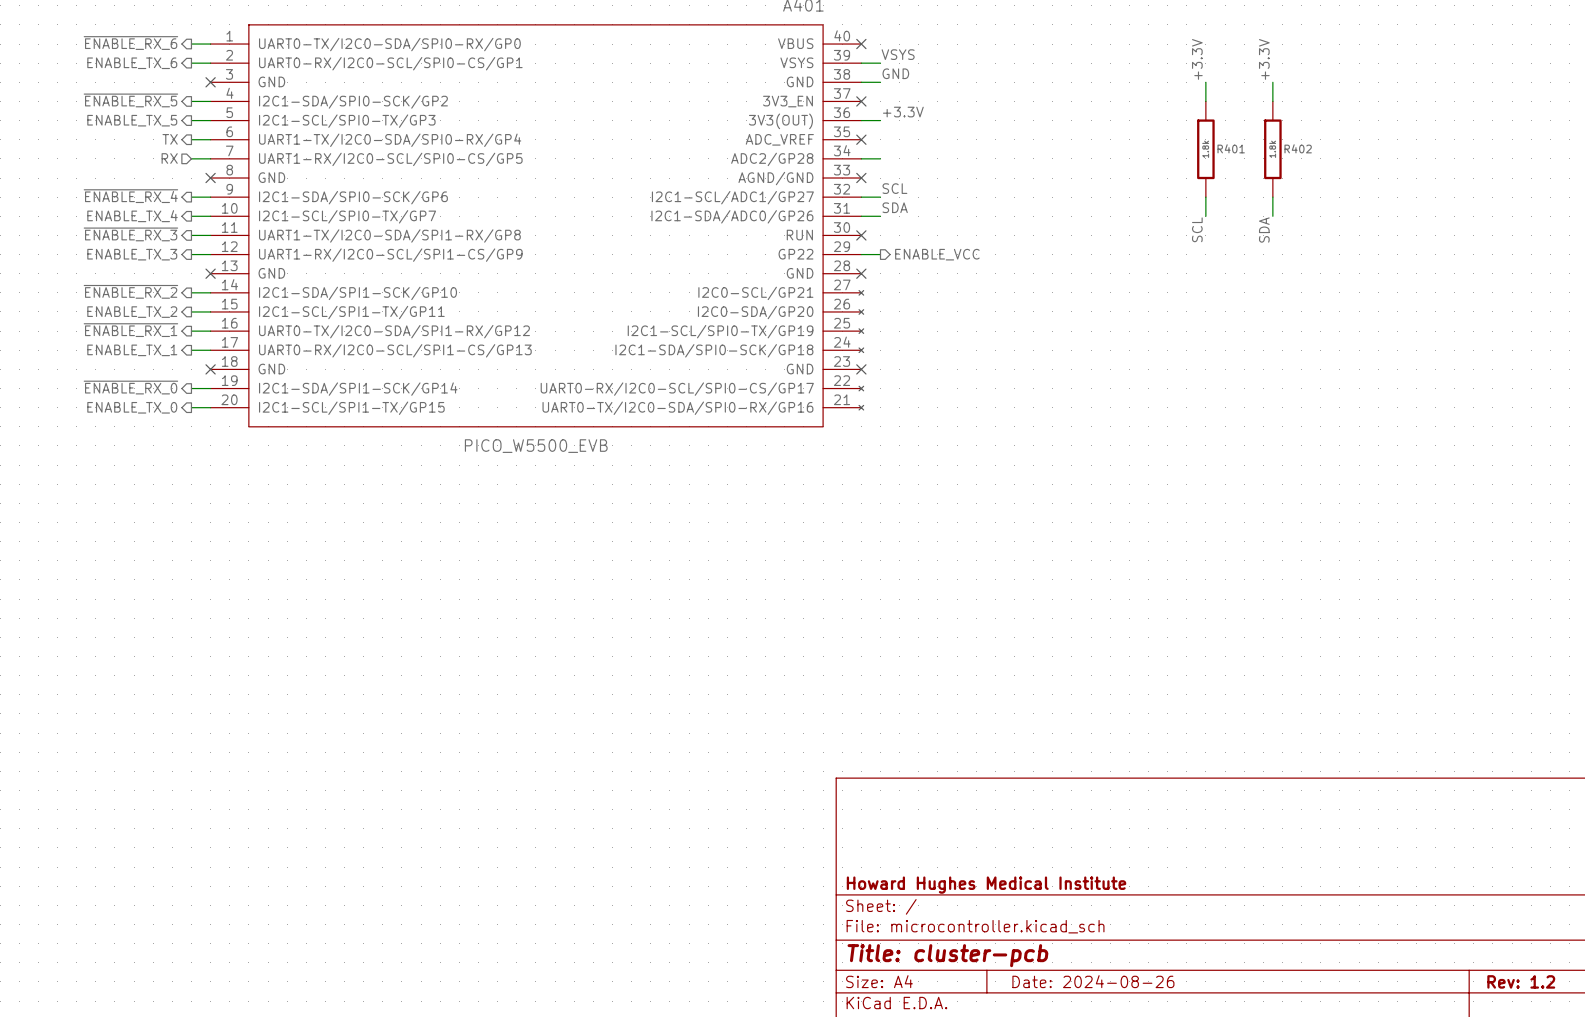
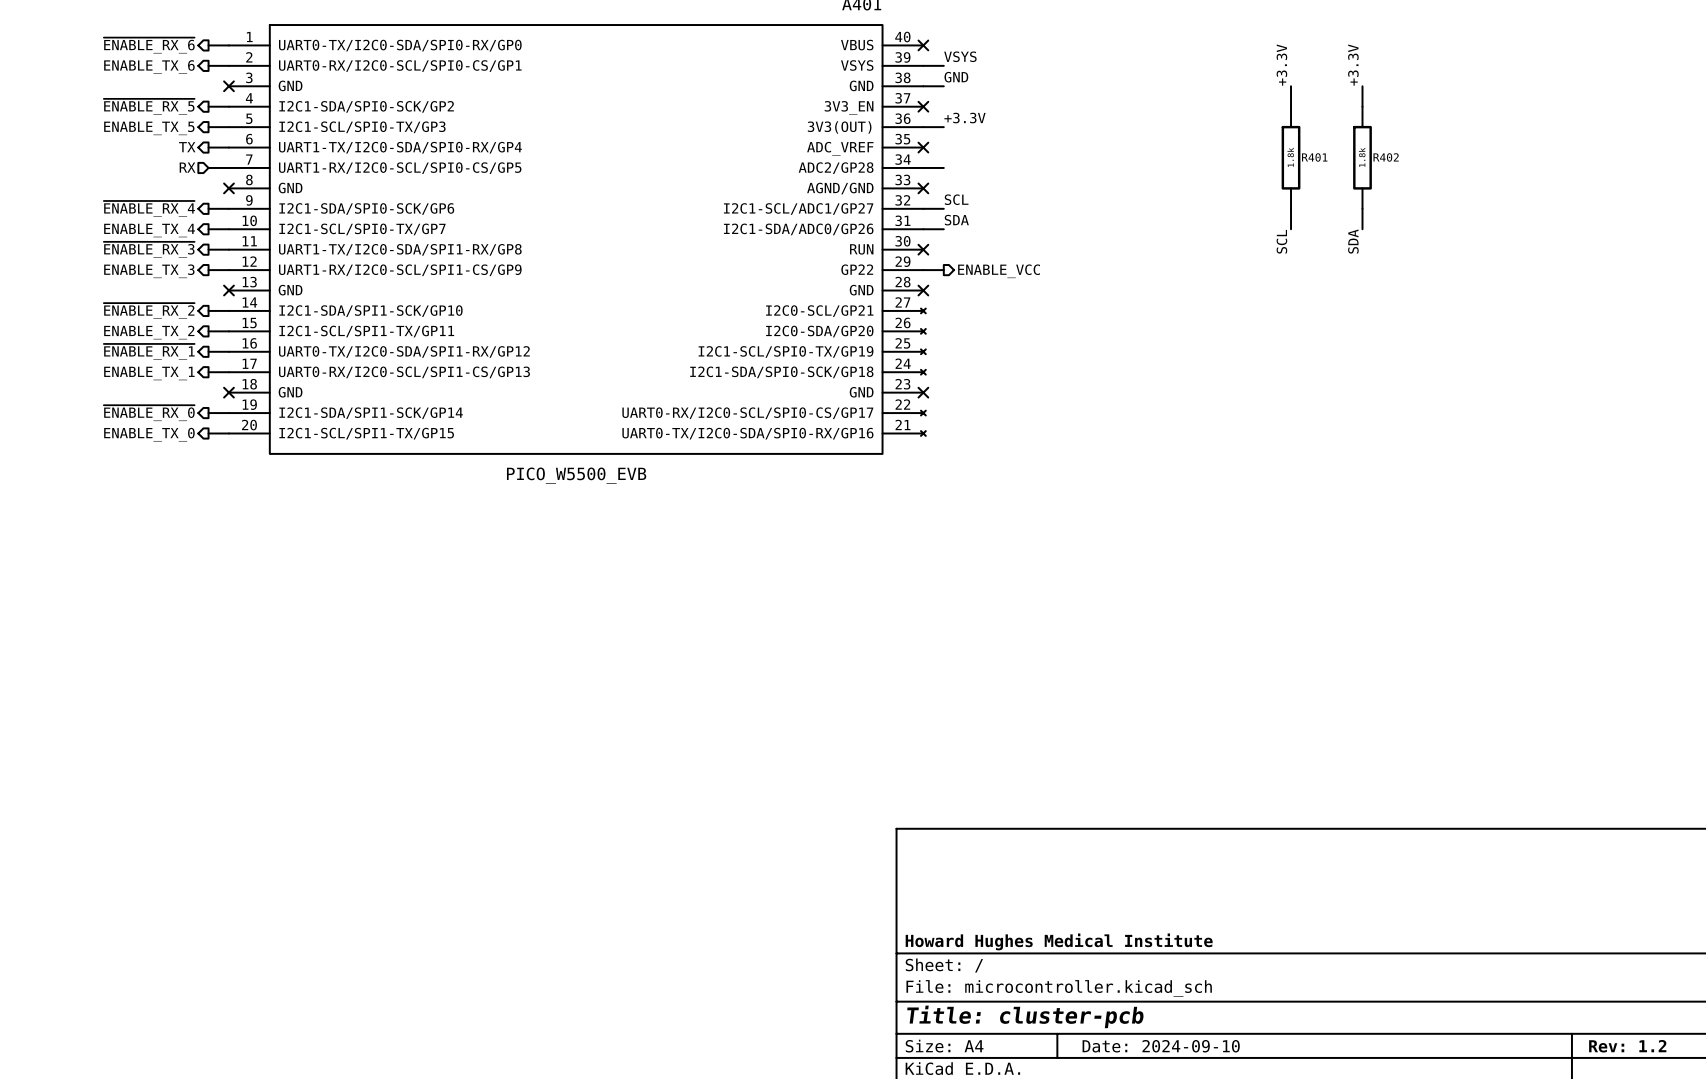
title block: Date: 2024-08-26 (1093, 981) -> Date: 2024-09-10 (1161, 1046)

